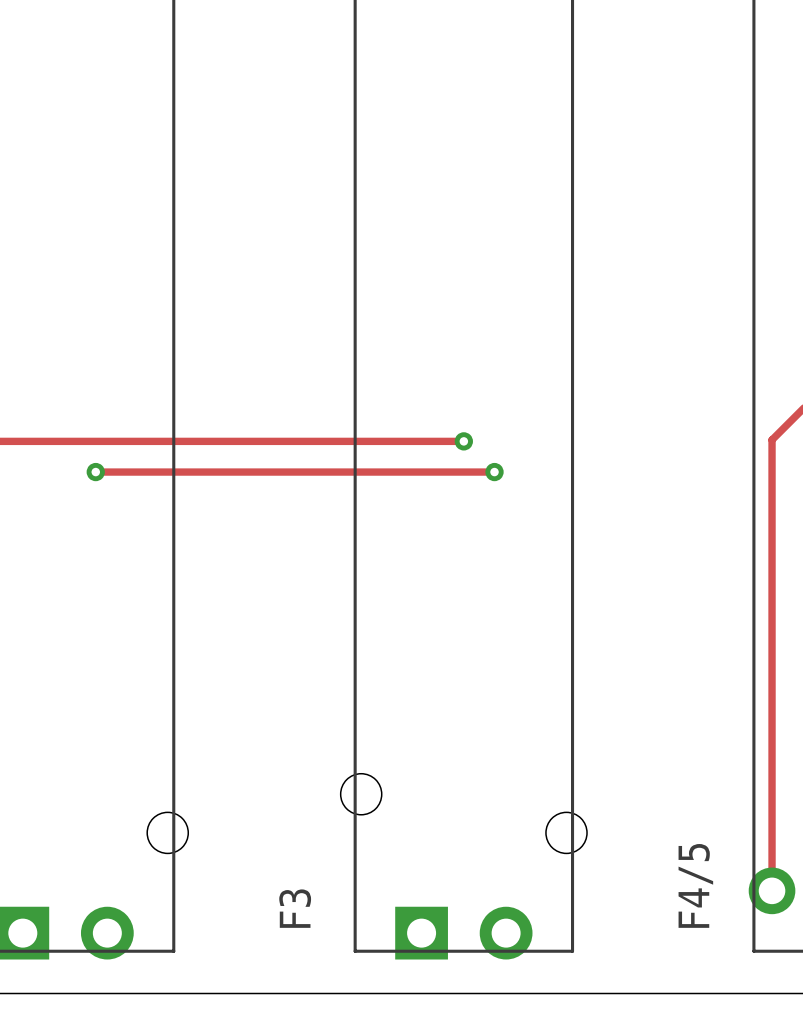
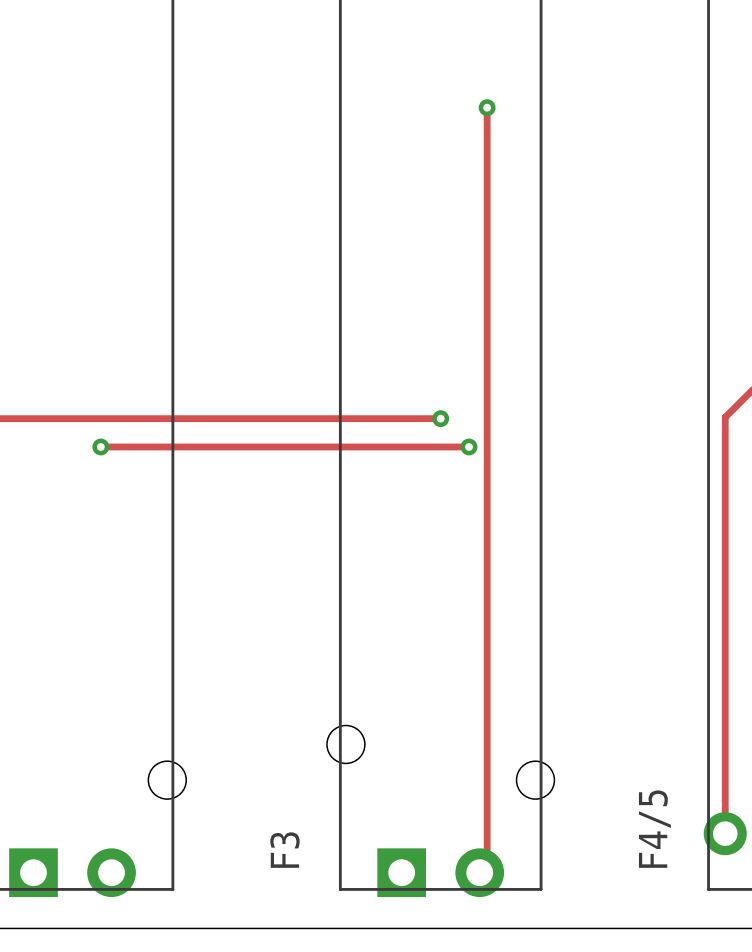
track: none -> (487, 107) (487, 867) (479, 872)
via: none -> (487, 107)

